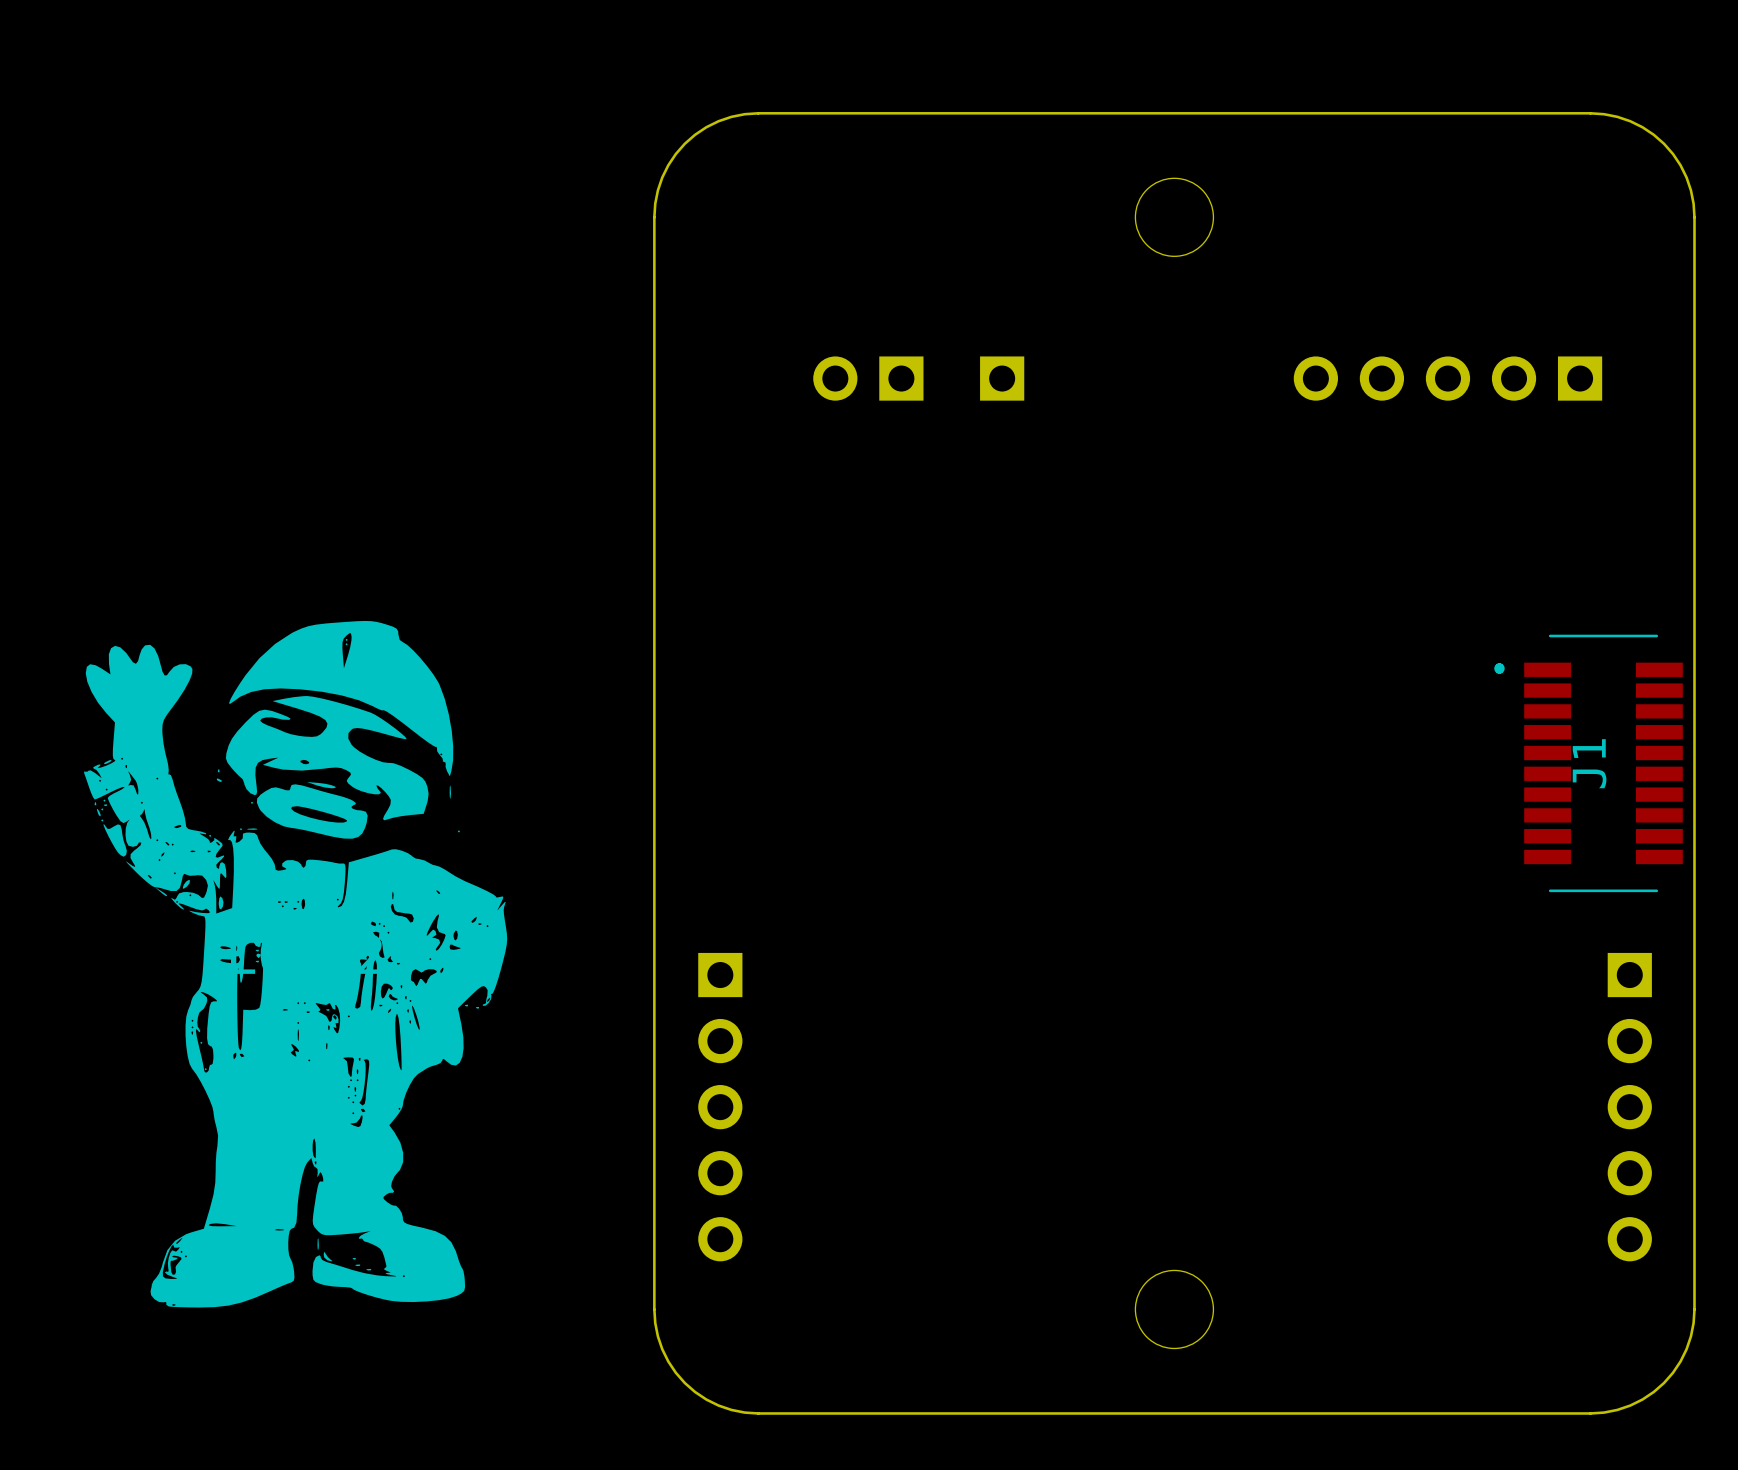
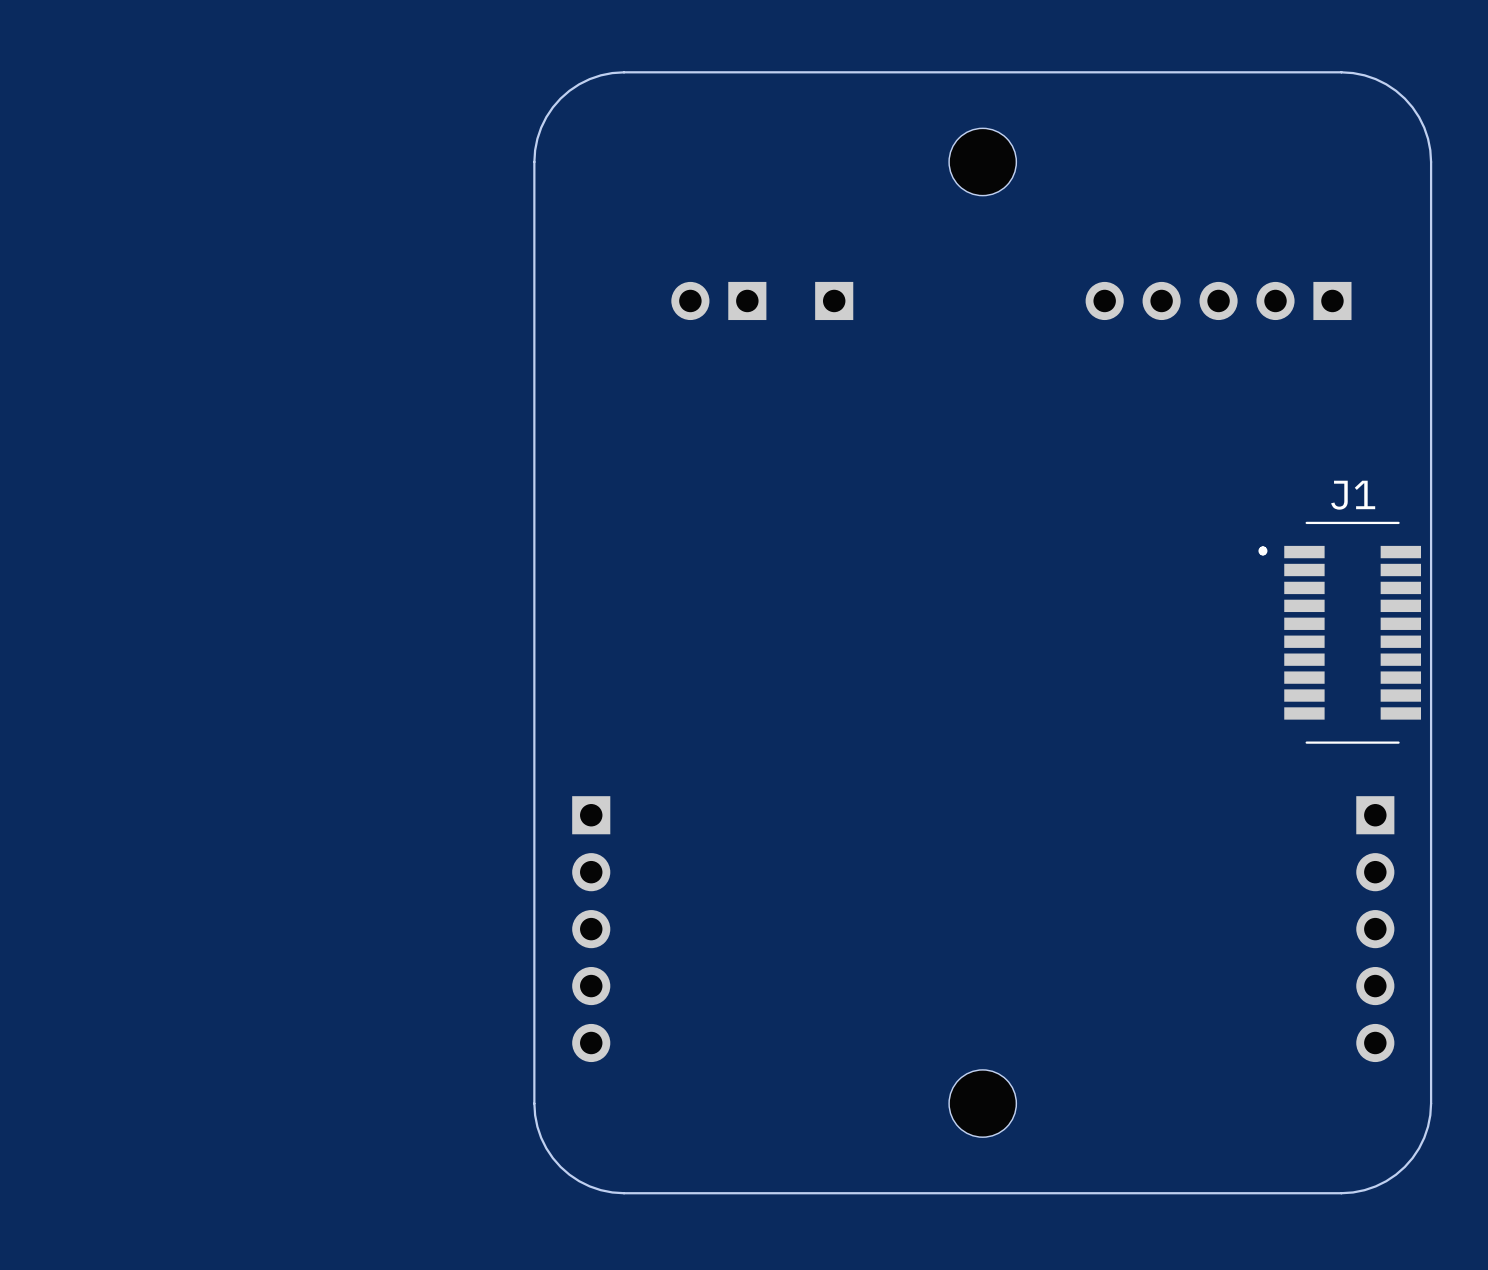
J1 name rotation: 0° (1589, 763) -> 90° clockwise (1353, 495)
J1 name position: J1 (1589, 763) -> J1 (1353, 495)
part: (295, 964) -> none

